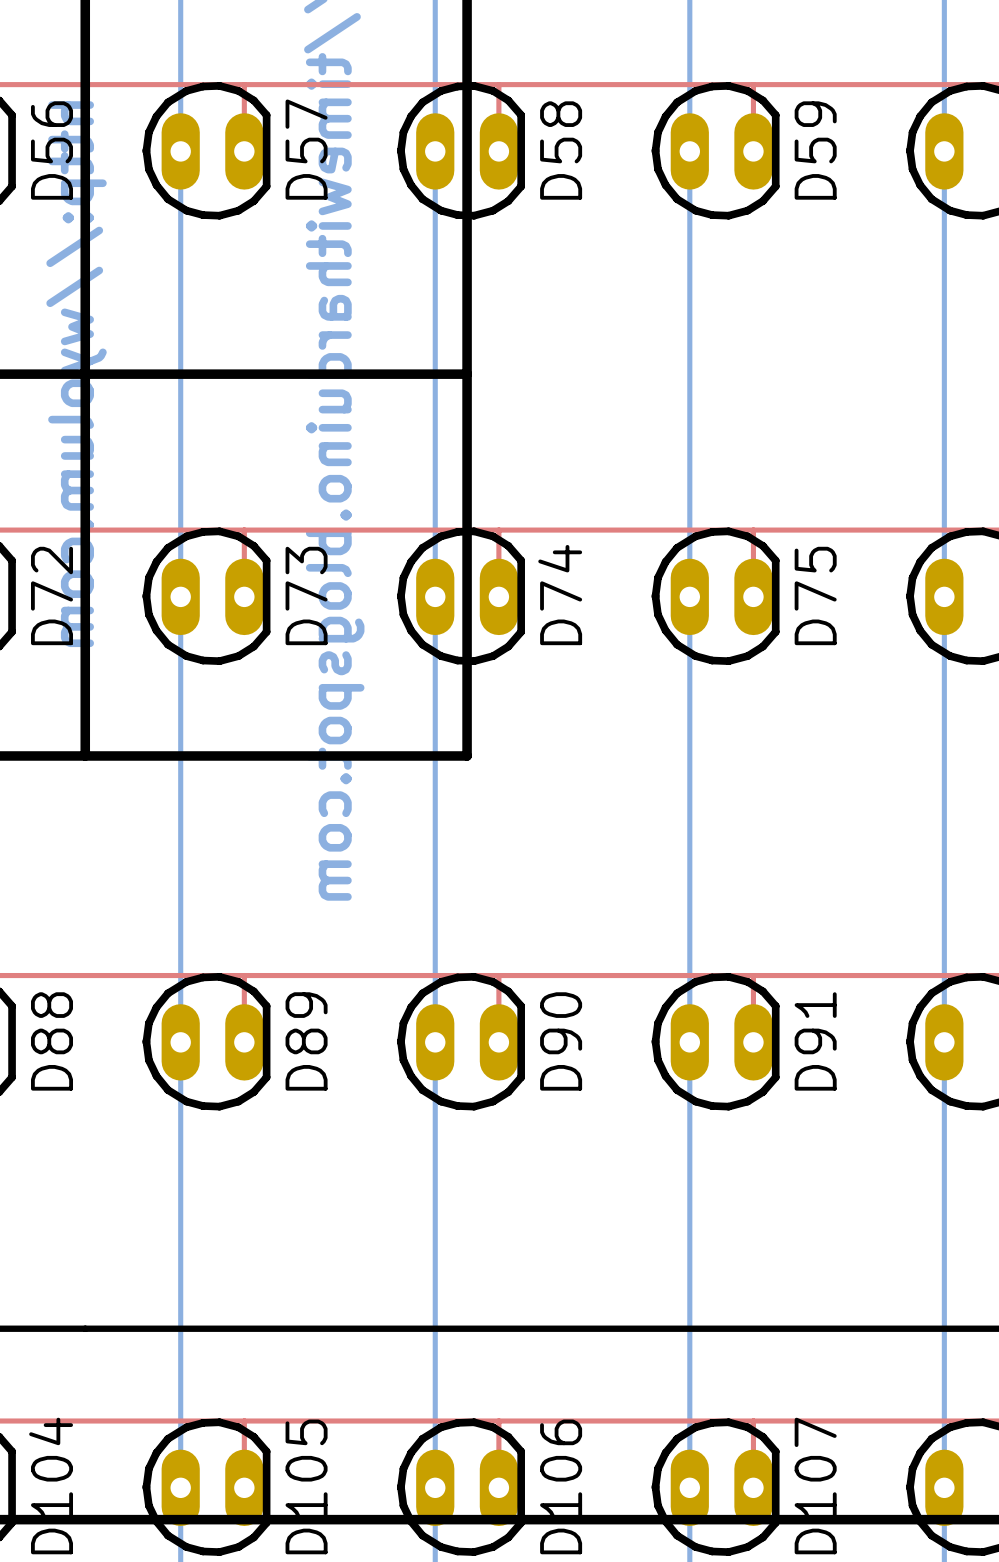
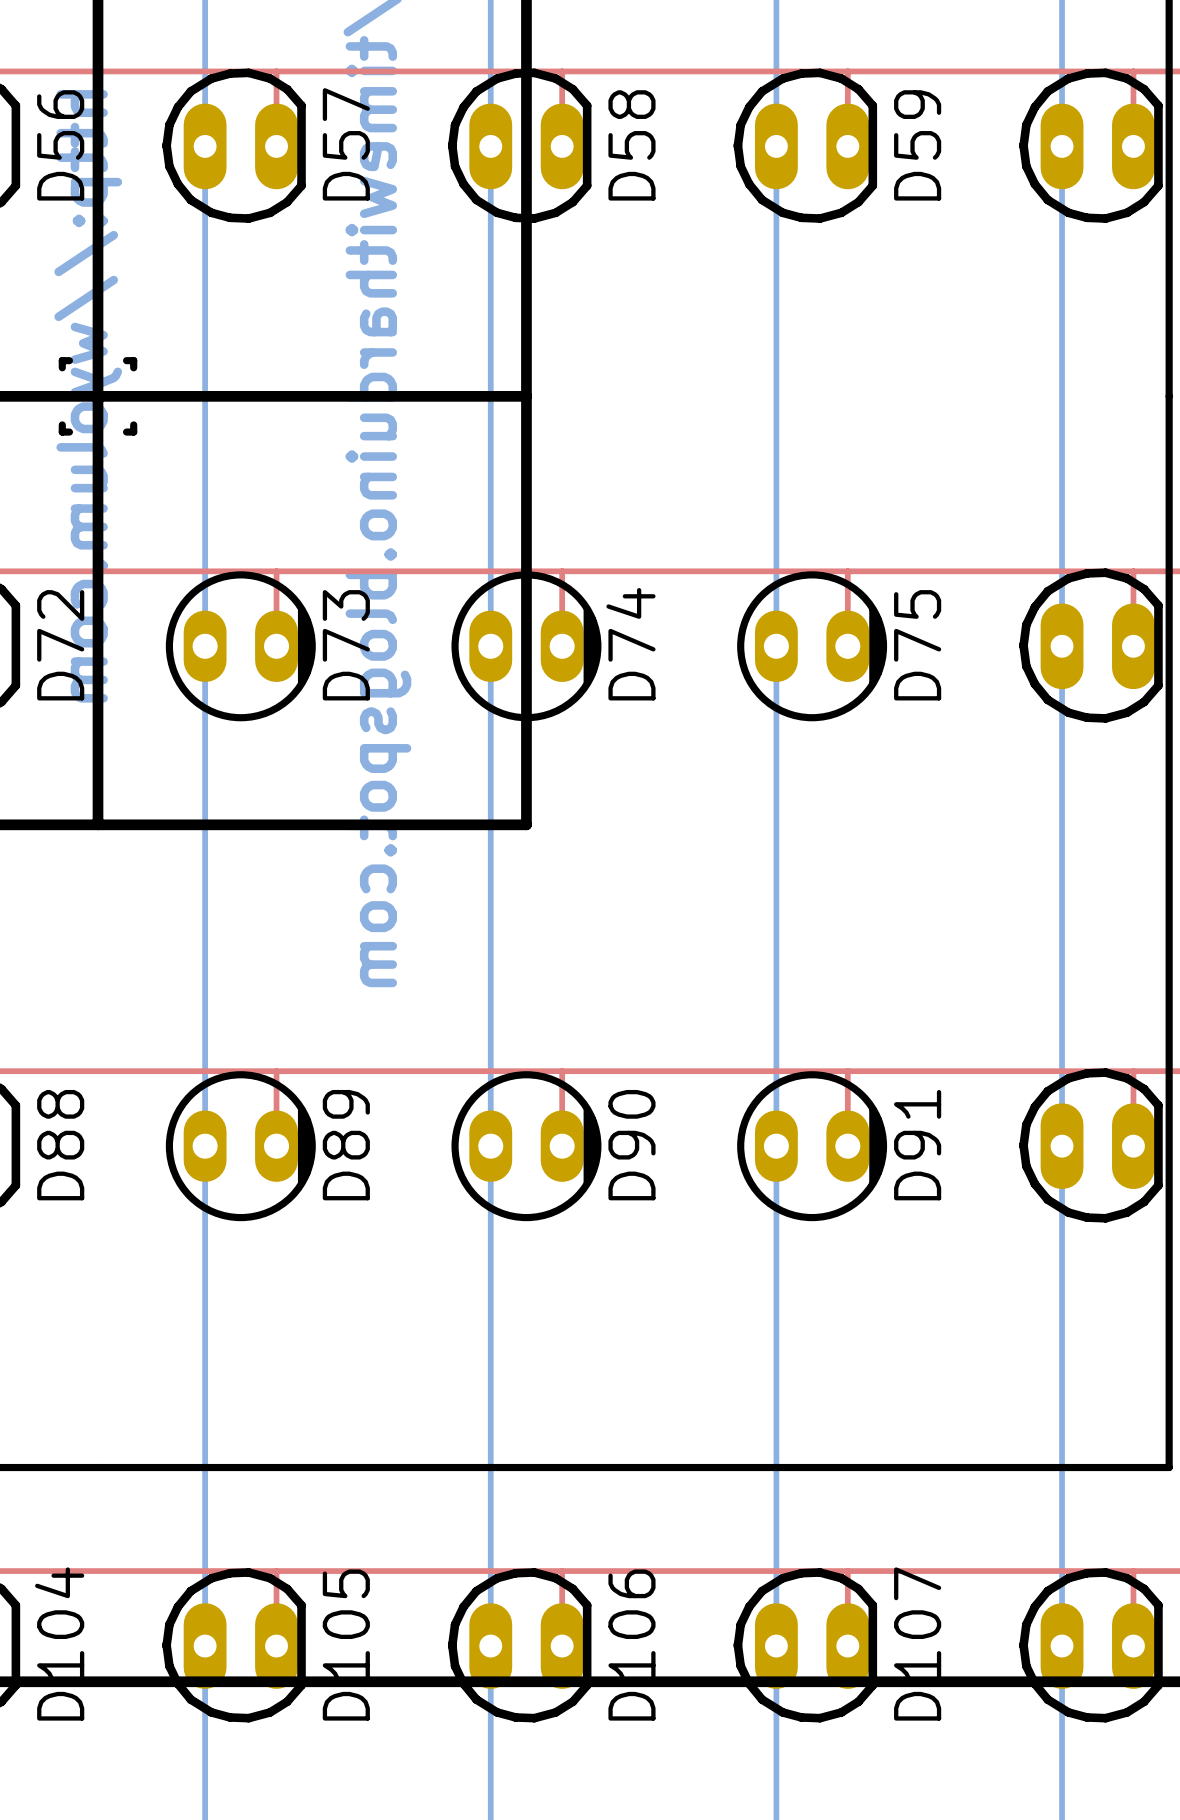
drawing: none -> [58, 357, 138, 436]
D73 footprint: [142, 527, 271, 665] -> [165, 571, 316, 722]
D74 footprint: [397, 527, 525, 665] -> [451, 571, 602, 722]
D75 footprint: [651, 527, 780, 665] -> [737, 571, 888, 722]
D89 footprint: [142, 972, 271, 1111] -> [165, 1071, 316, 1222]
D90 footprint: [397, 972, 525, 1111] -> [451, 1071, 602, 1222]
D91 footprint: [651, 972, 780, 1111] -> [737, 1071, 888, 1222]

